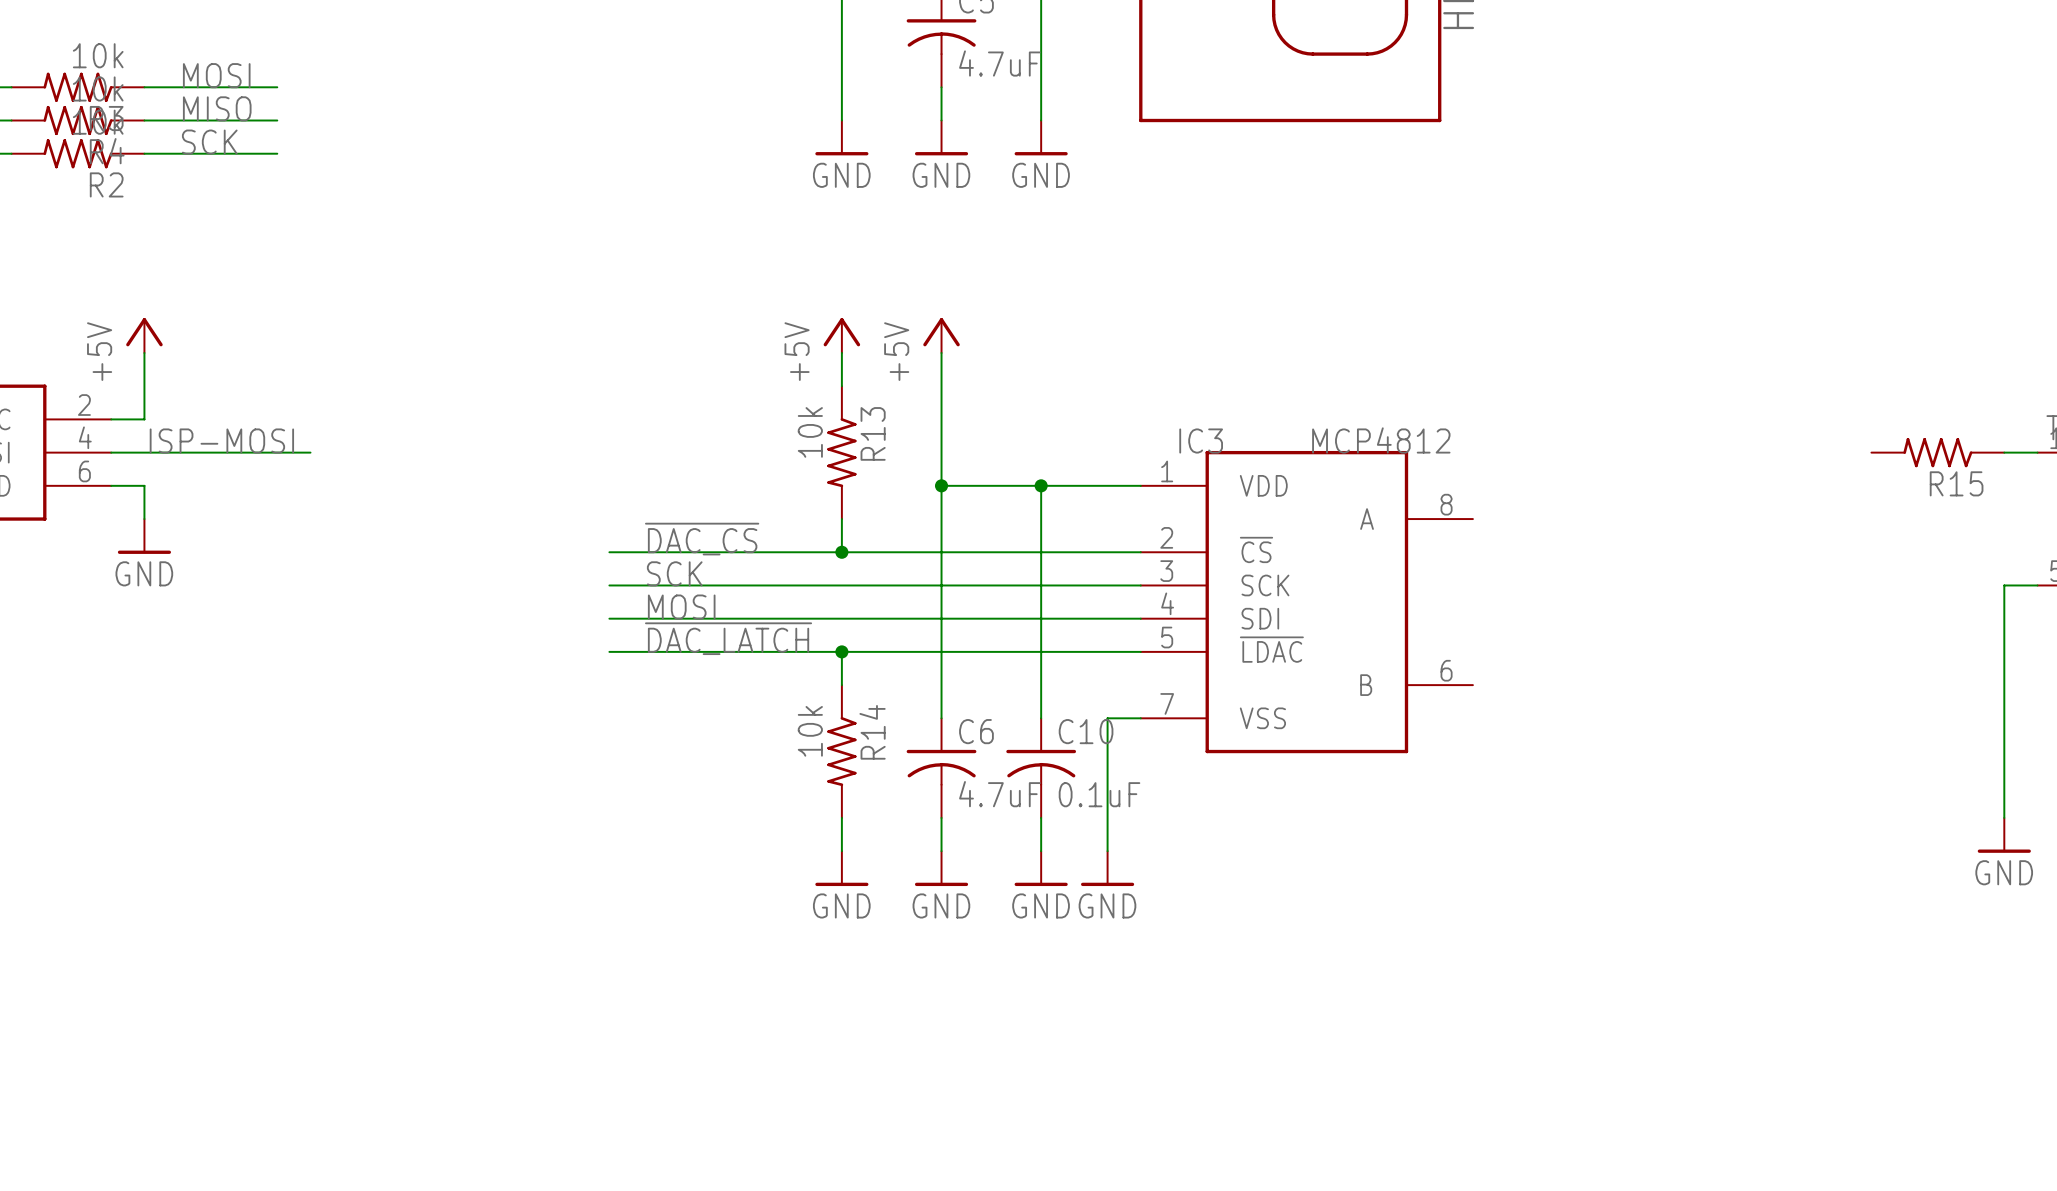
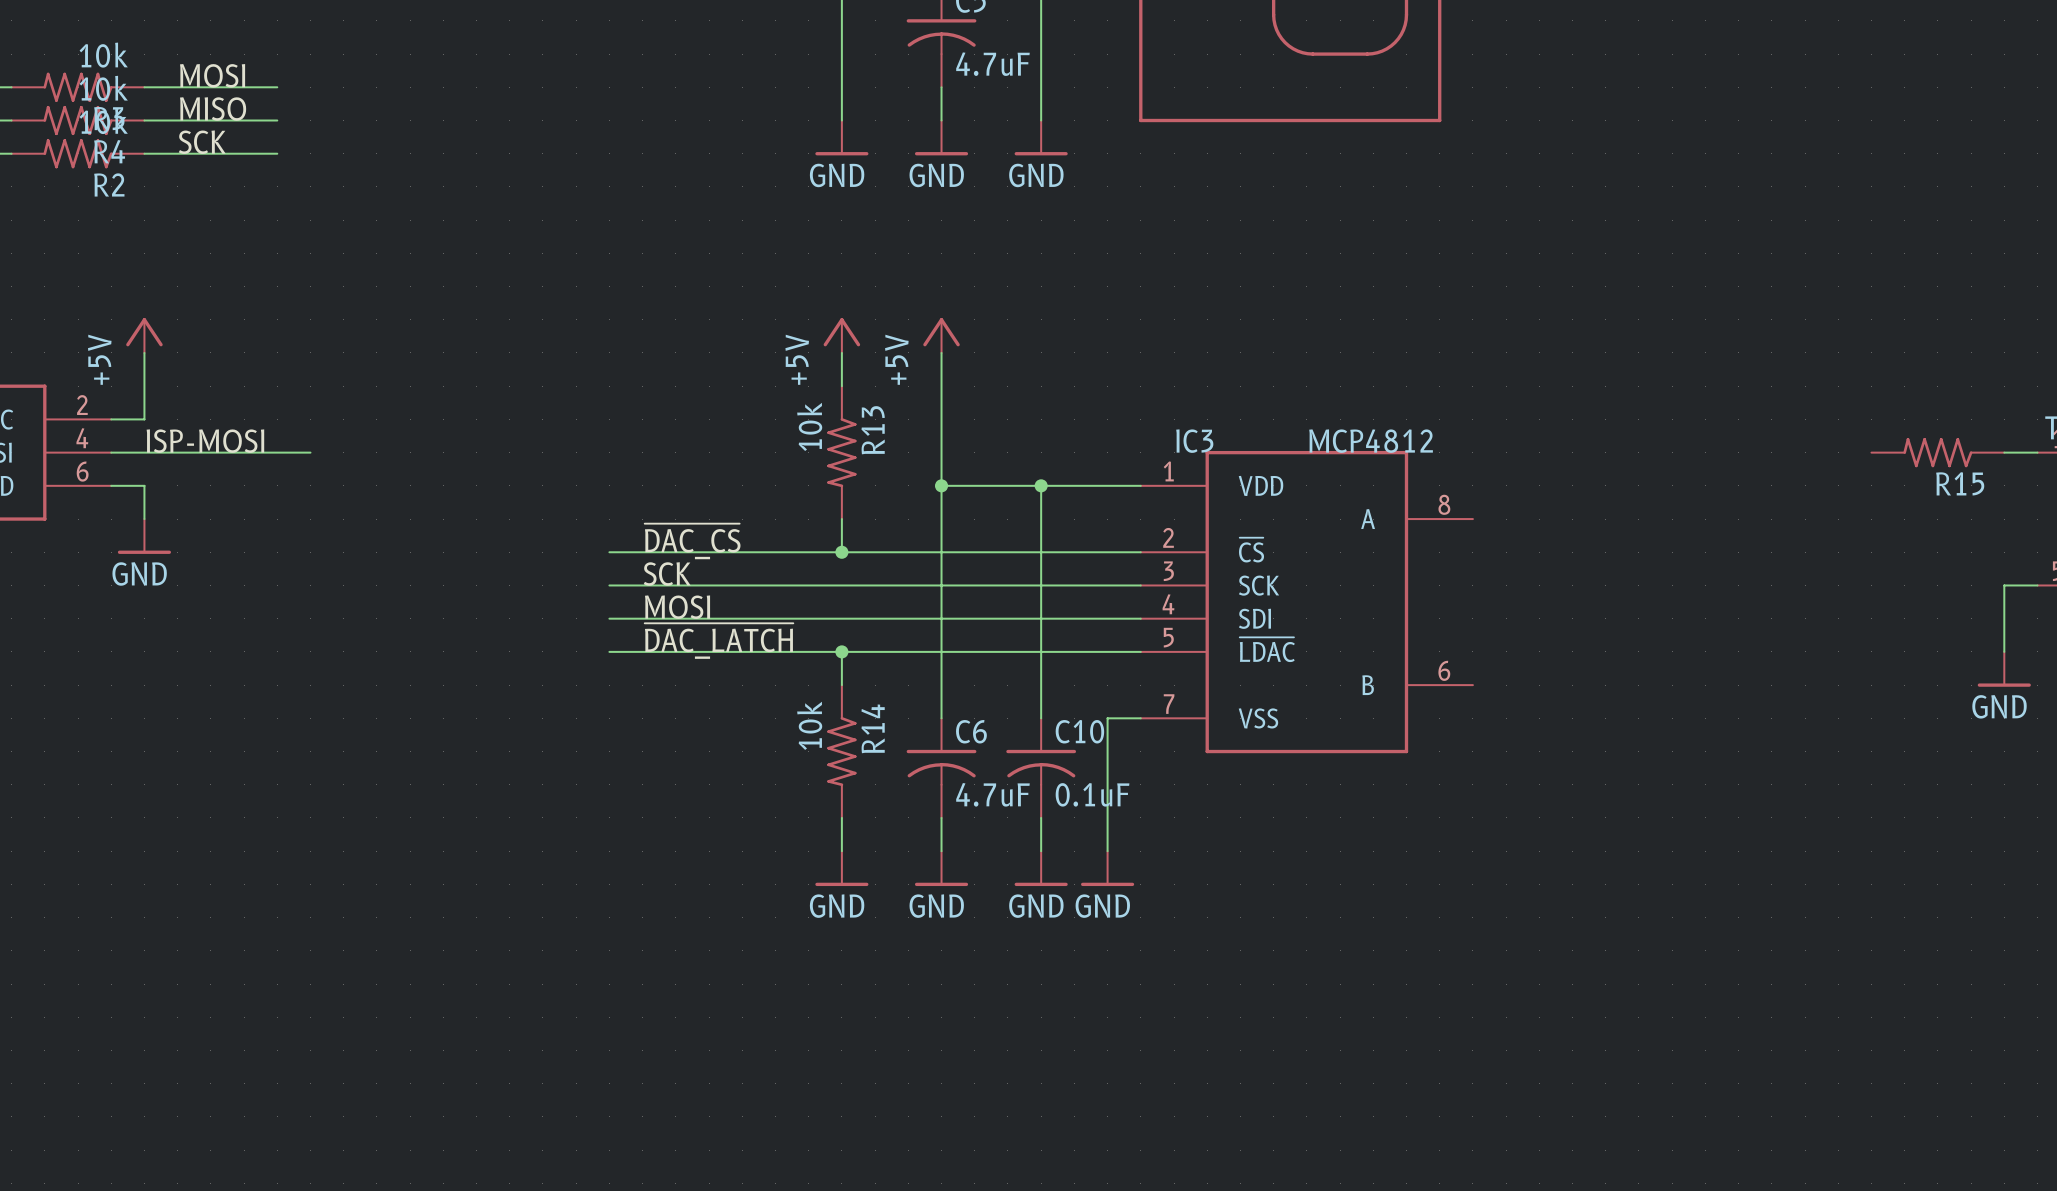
wire: (2004, 651) (2004, 817) -> none
power symbol position: GND (2004, 835) -> GND (2004, 669)

